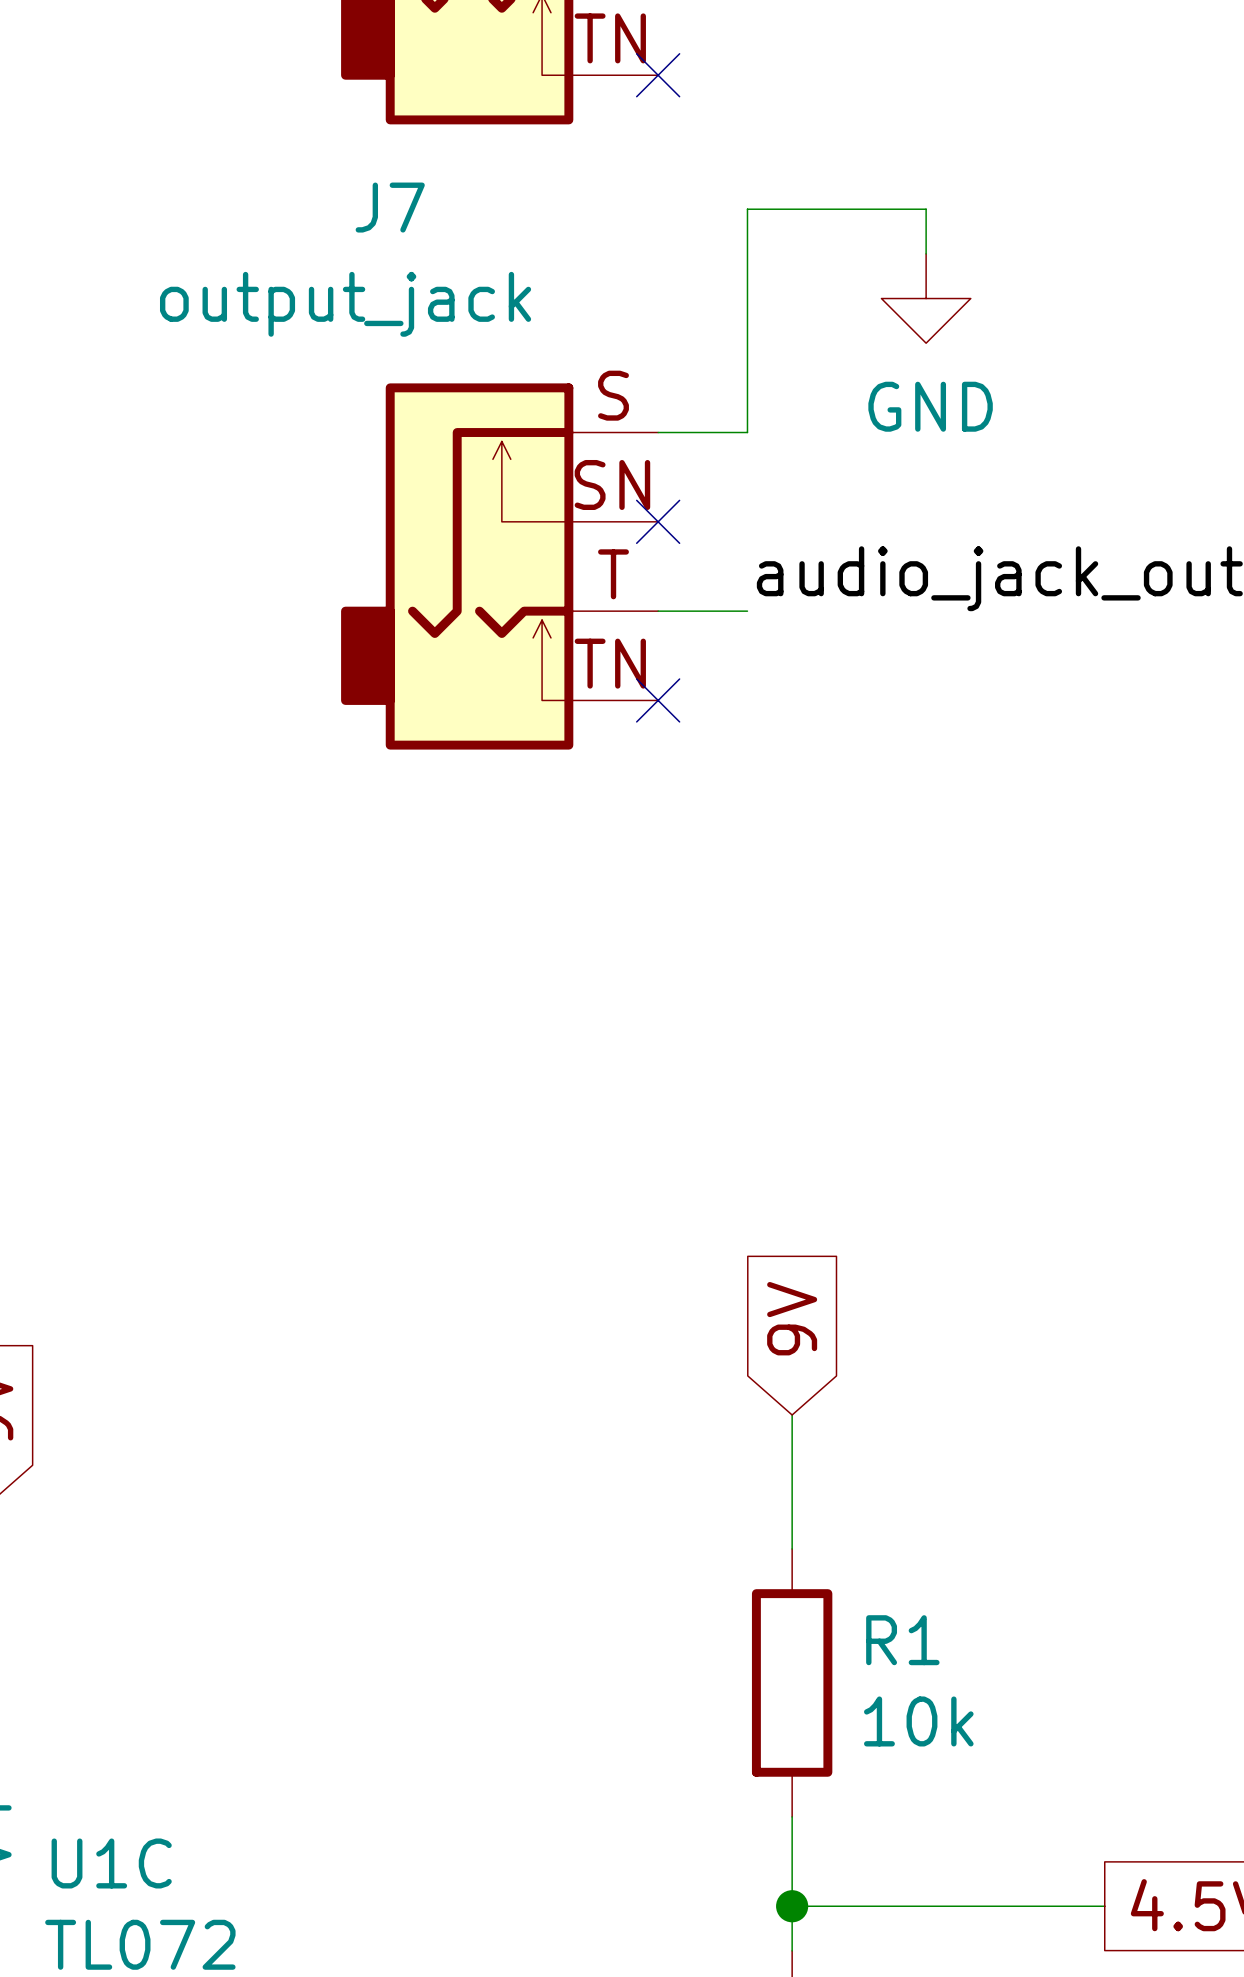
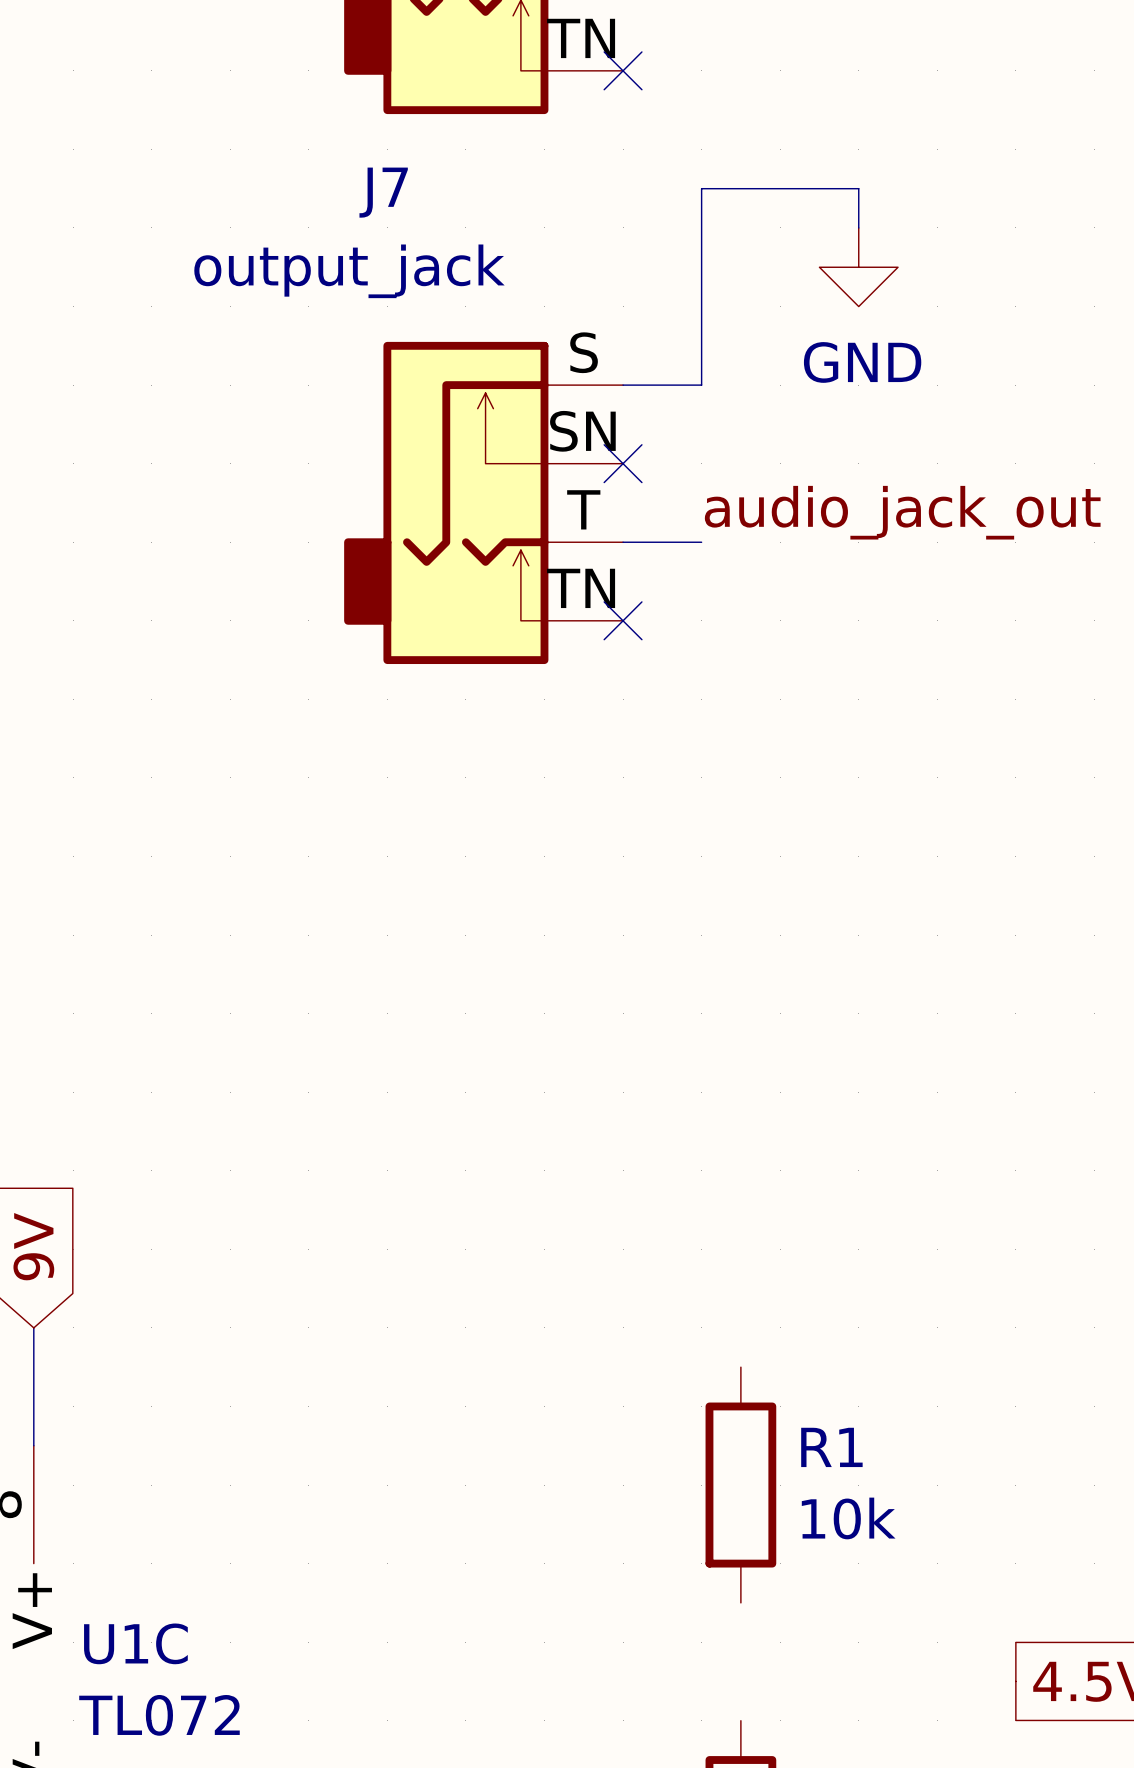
global label: 9V (792, 1318) -> none
wire: (792, 1415) (792, 1548) -> none
wire: (792, 1816) (792, 1950) -> none
wire: (792, 1906) (1104, 1906) -> none
junction: (792, 1906) -> none

